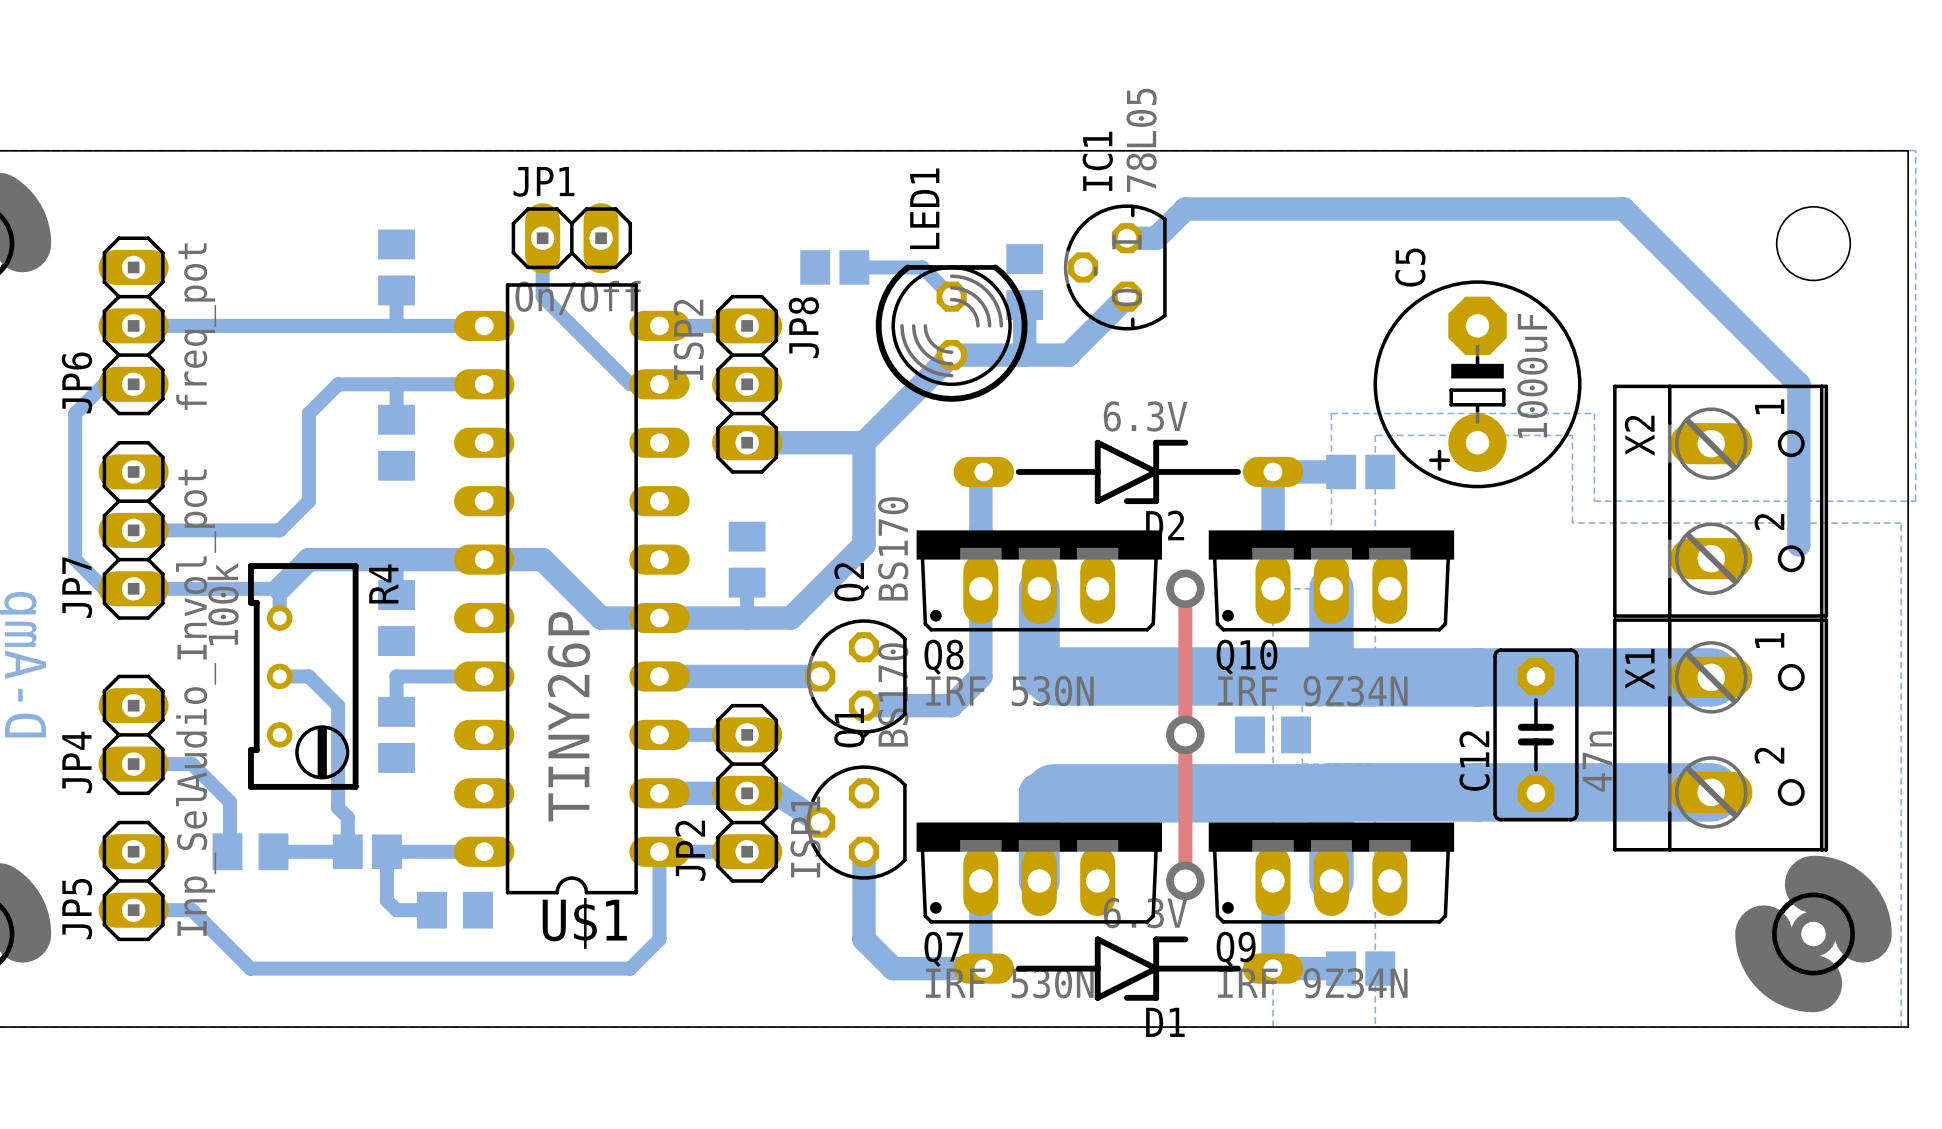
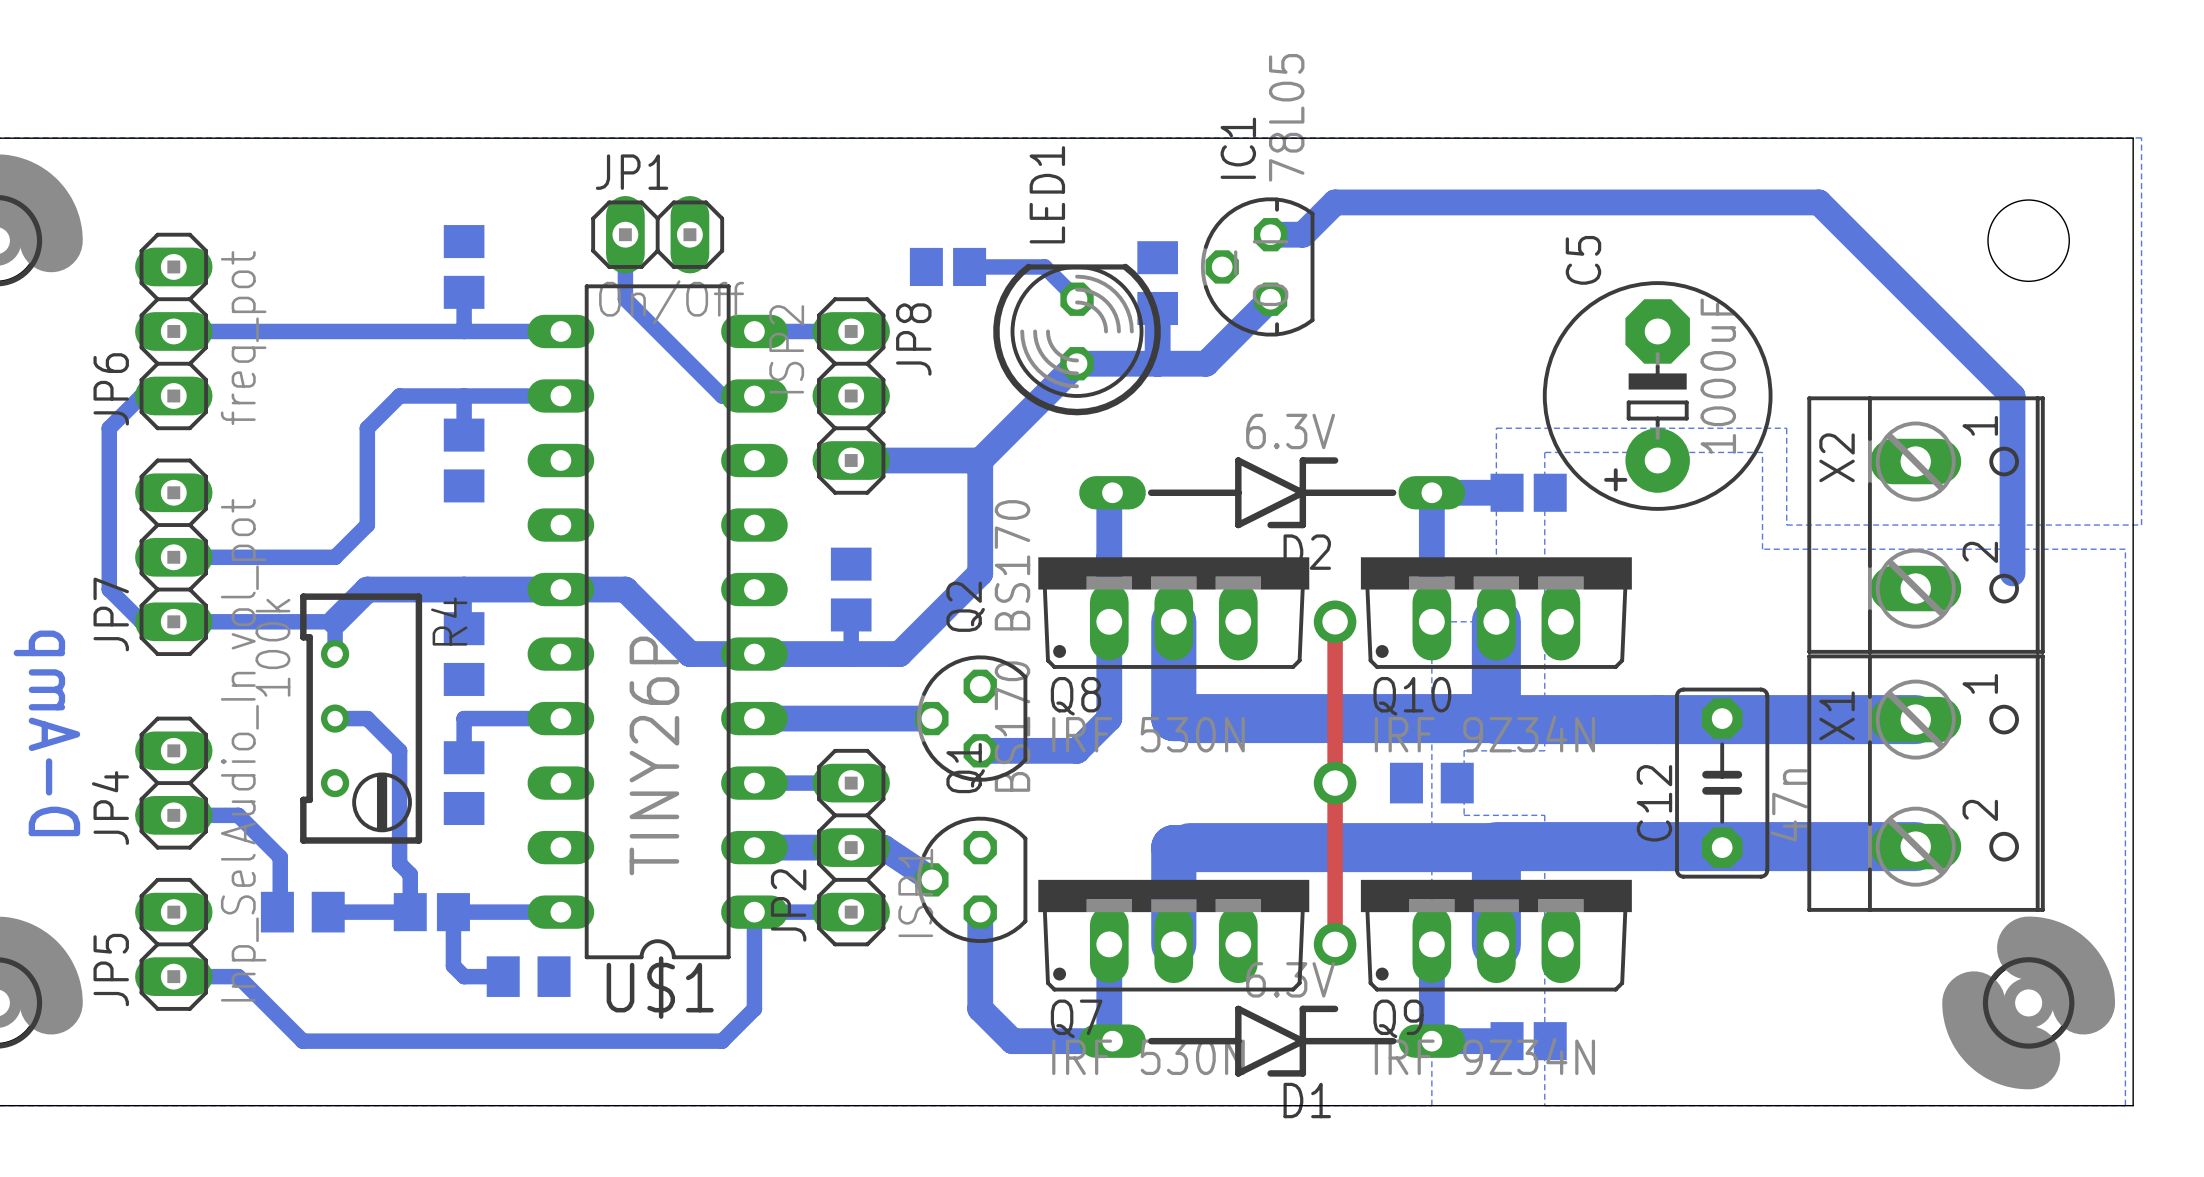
bottom track width: thick (1053, 676) (1331, 676) -> thin (1189, 718) (1496, 718)
bottom track width: thick (1331, 677) (1711, 677) -> thin (1496, 719) (1915, 719)
bottom track width: thick (1331, 792) (1711, 792) -> thin (1496, 846) (1915, 846)
bottom track width: thick (1053, 793) (1331, 793) -> thin (1189, 847) (1496, 847)

